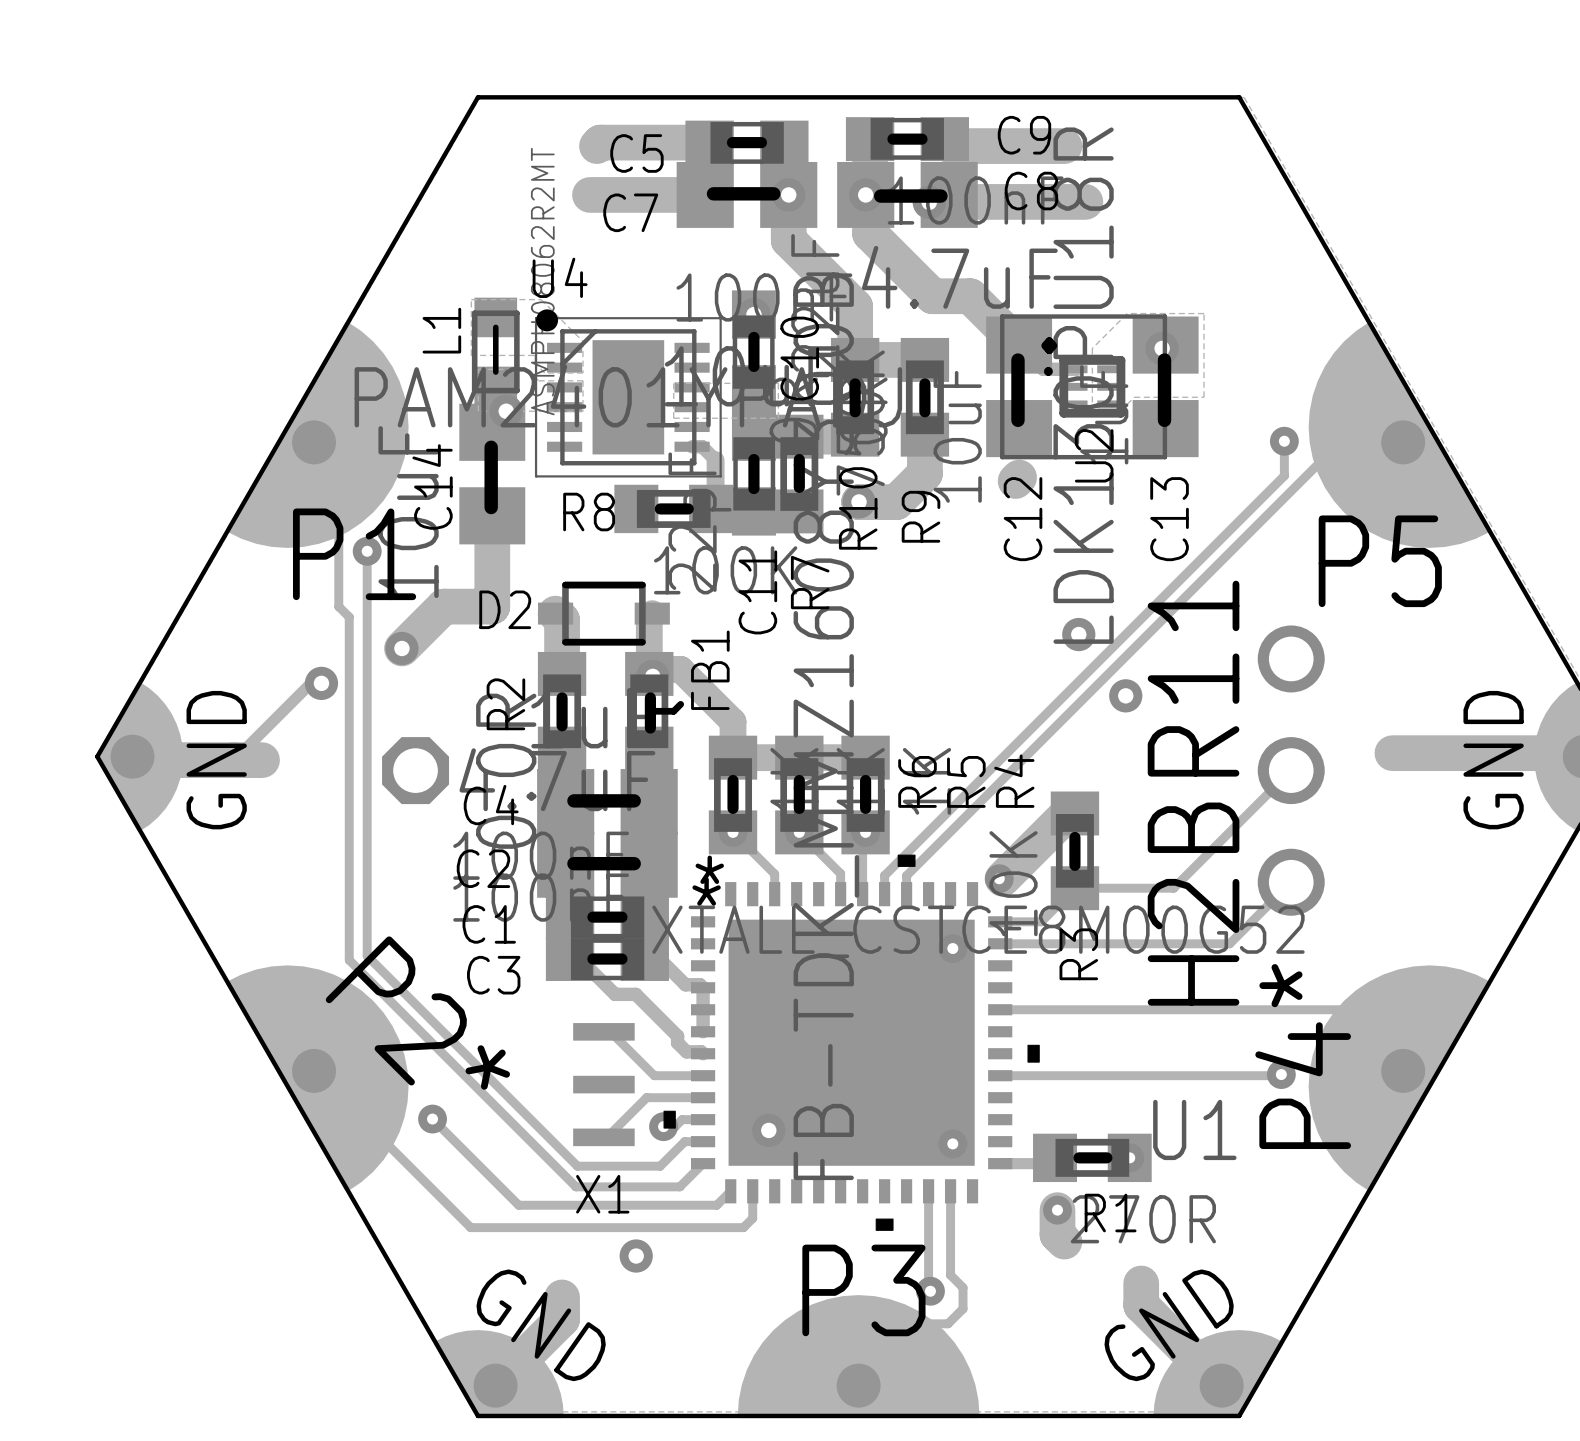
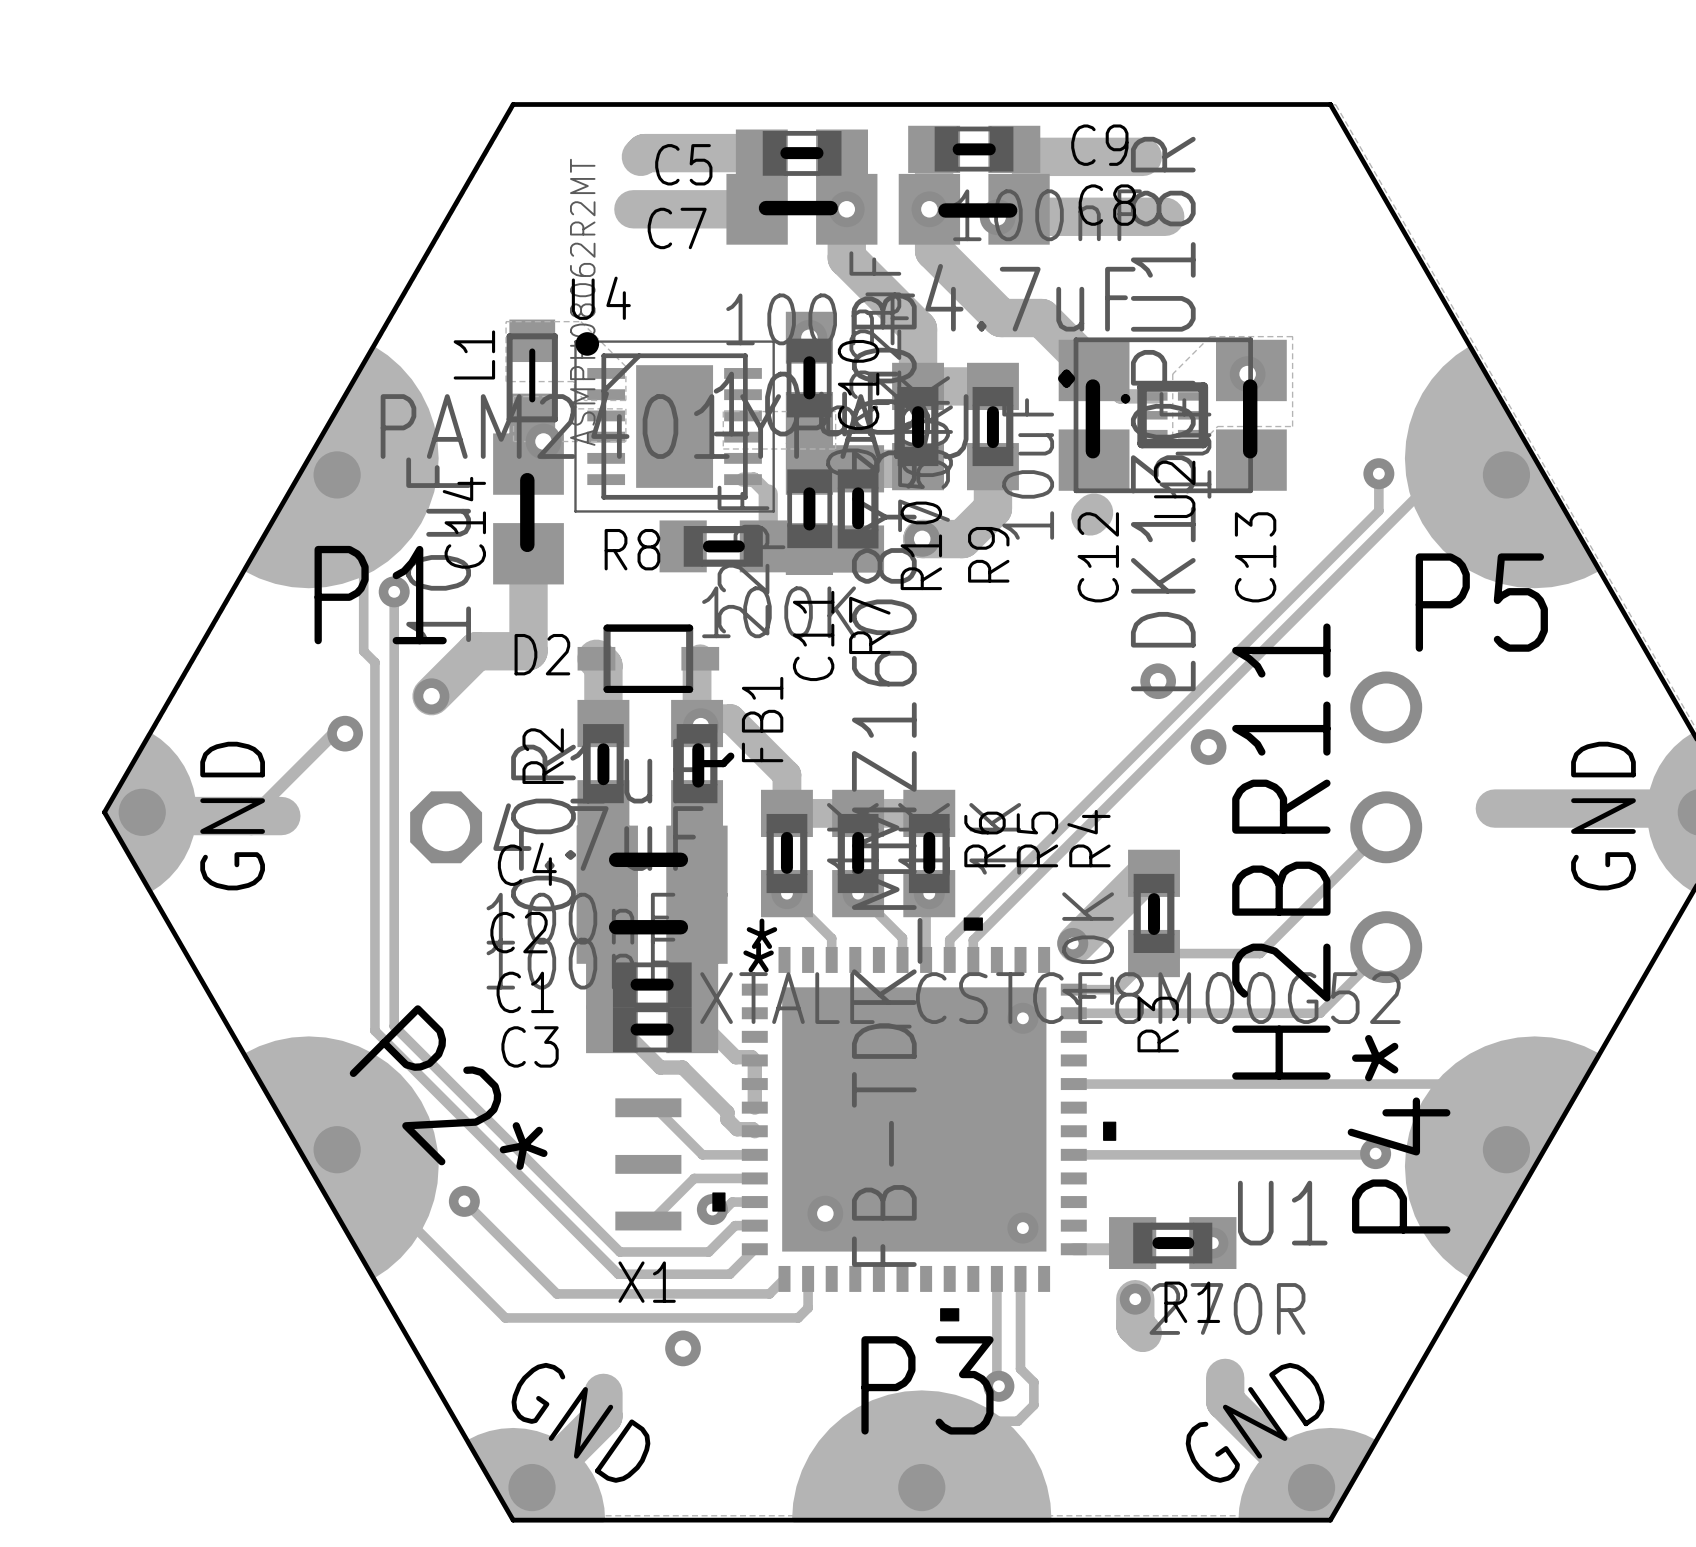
text position: . (1049, 345) -> . (1066, 378)

